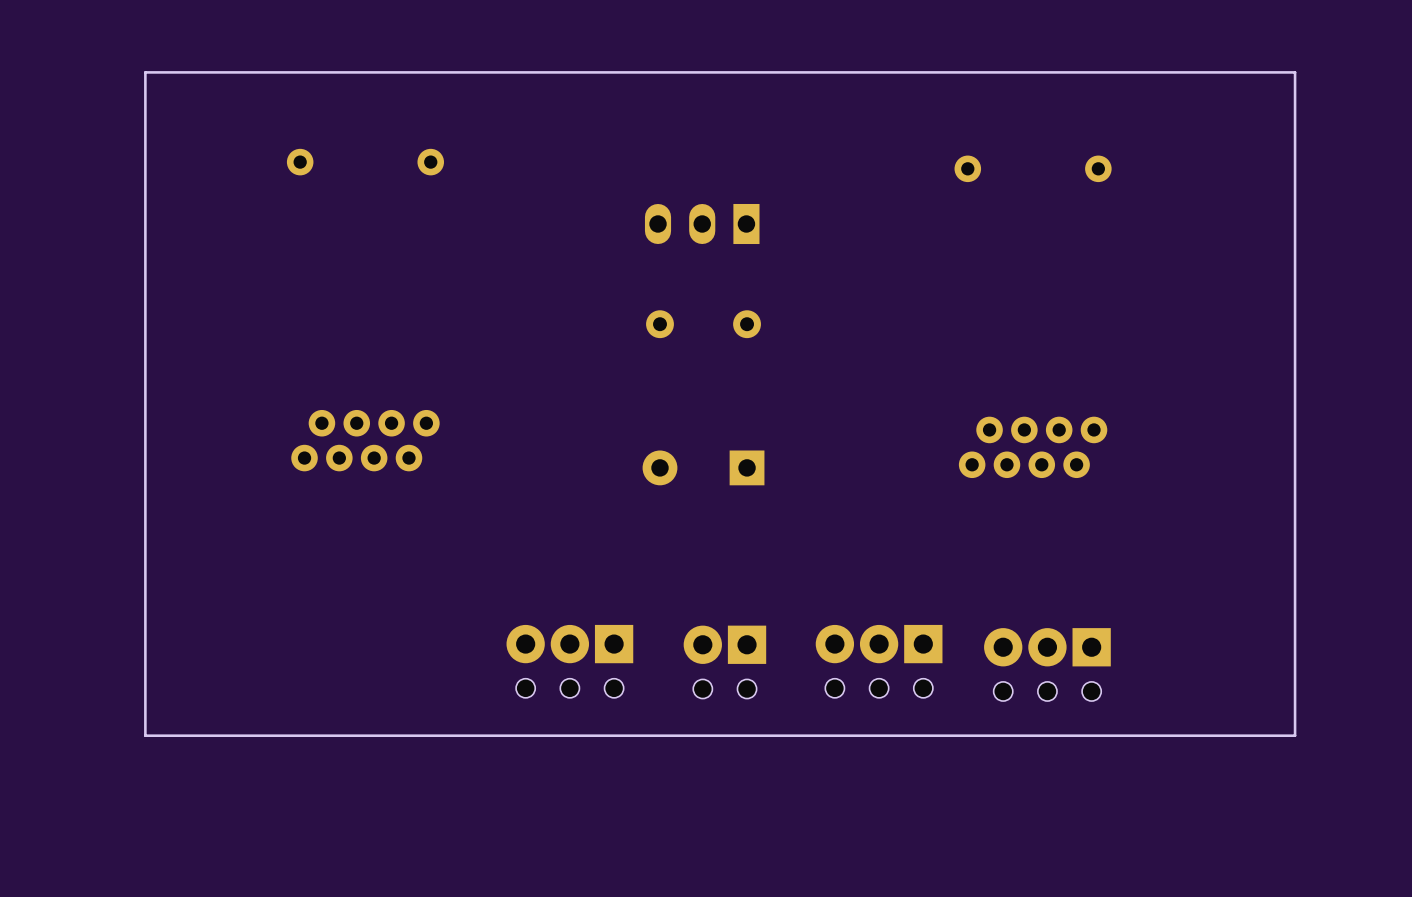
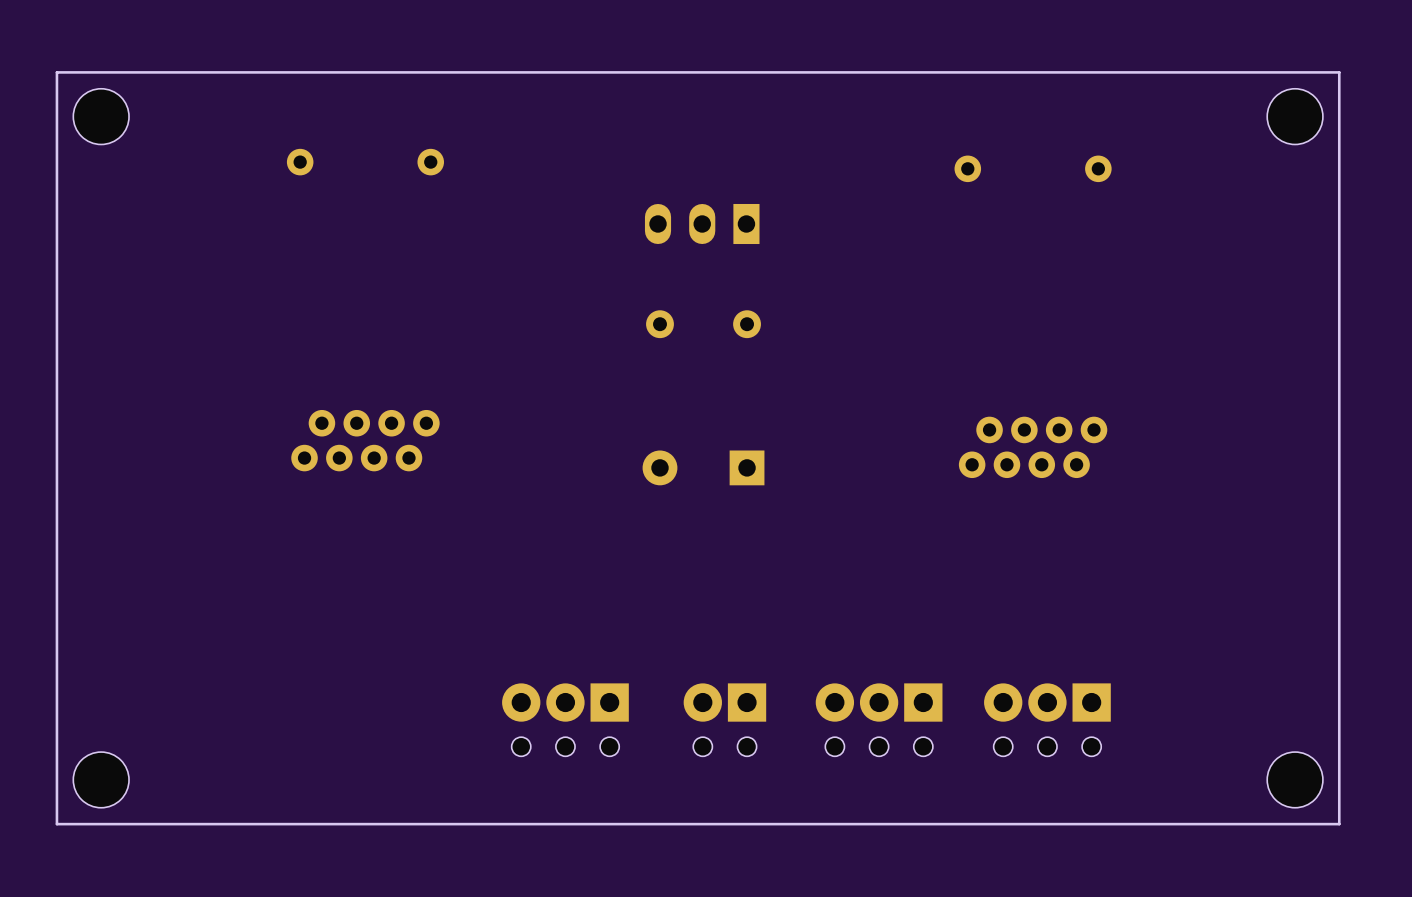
board edge: (1295, 72) (1295, 735) (145, 735) (145, 72) -> (1295, 72) (1339, 72) (1339, 824) (56, 824) (56, 72) (145, 72)
part: none -> (101, 116)
part: none -> (1295, 116)
part position: (569, 661) -> (565, 719)
part position: (879, 661) -> (879, 719)
part position: (724, 662) -> (724, 719)
part position: (1047, 664) -> (1047, 719)
part: none -> (101, 779)
part: none -> (1295, 779)

